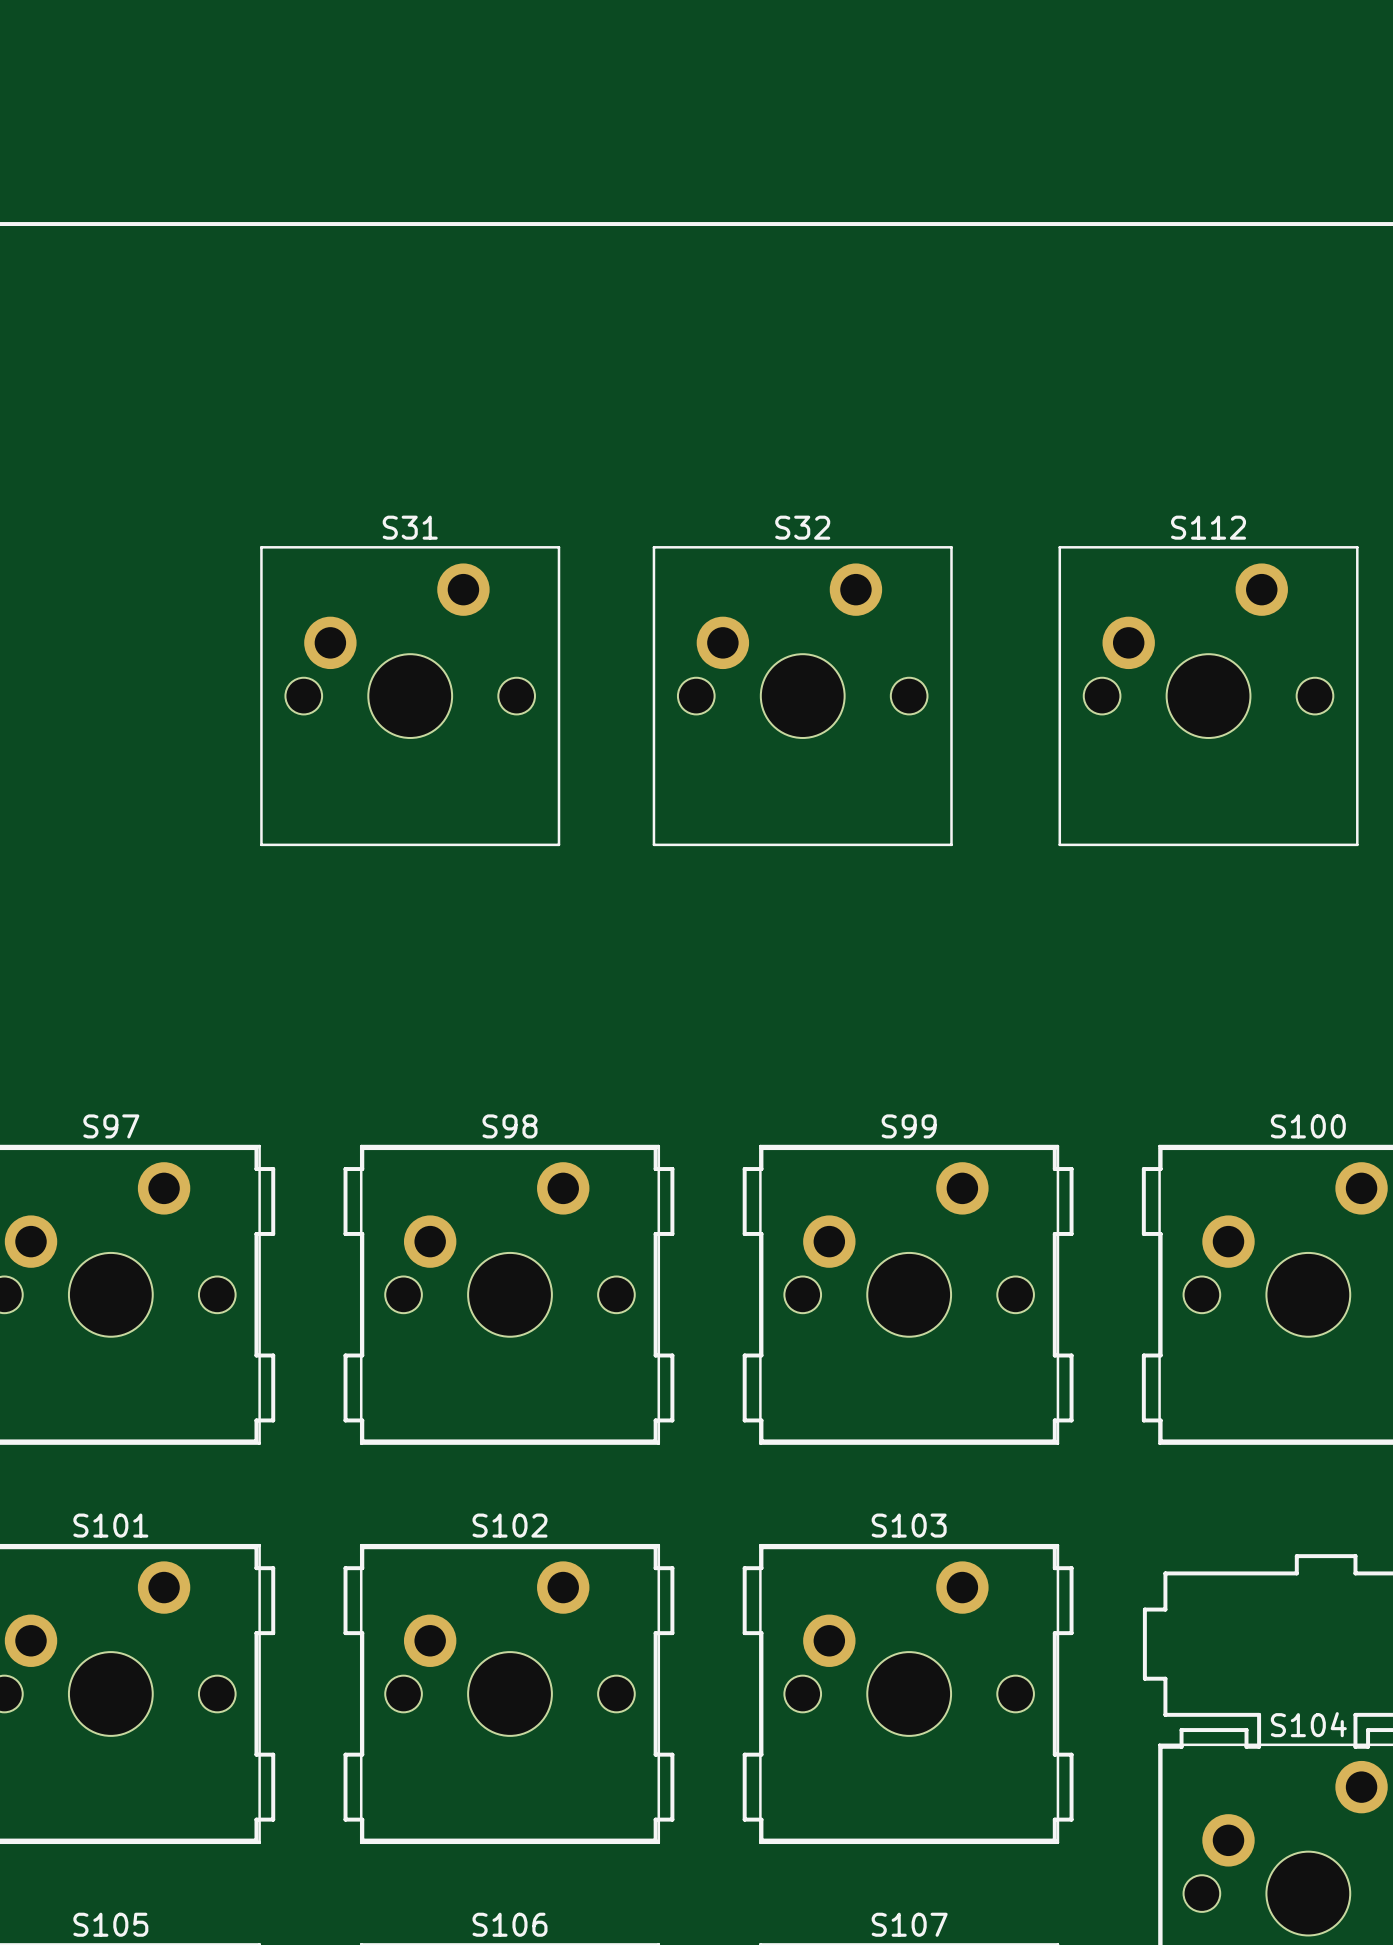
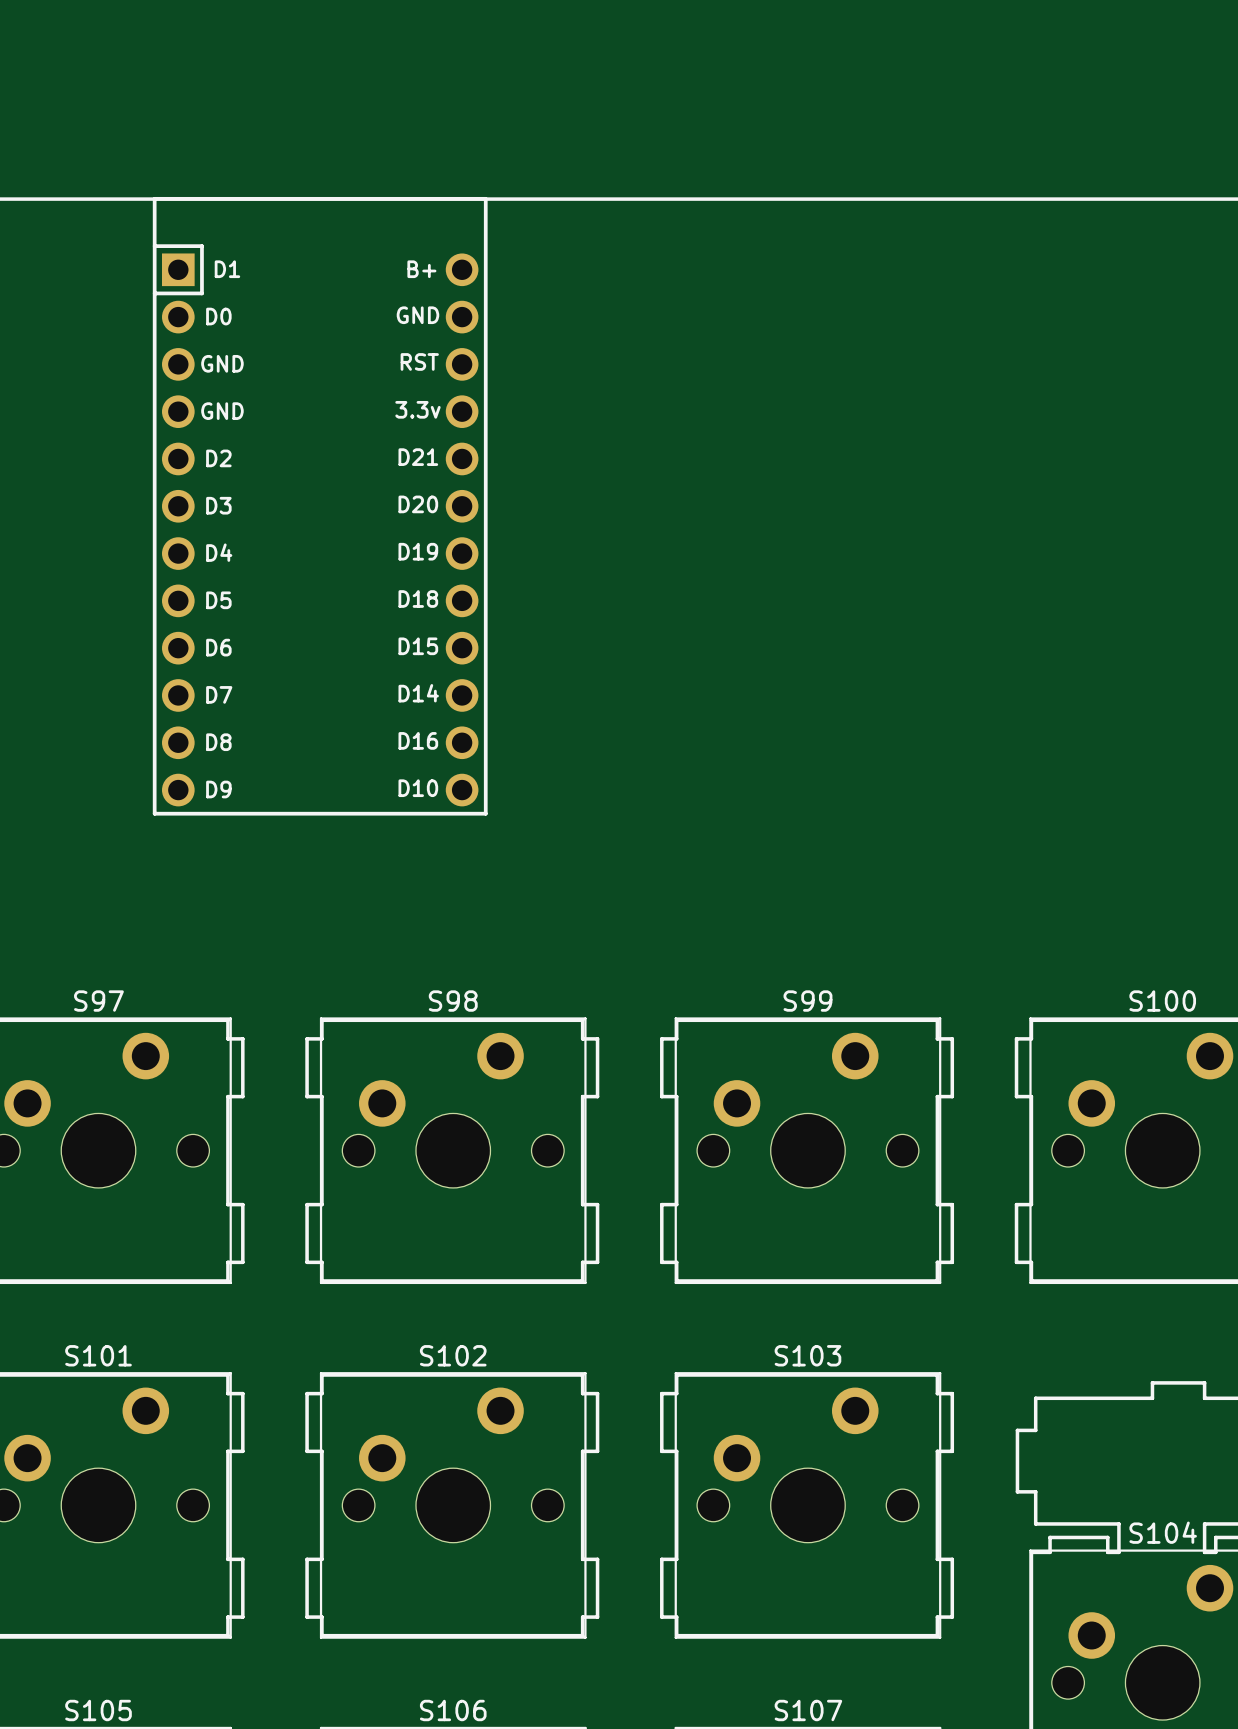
part: none -> (320, 506)
S31: (410, 696) -> none
S32: (802, 696) -> none
S112: (1208, 696) -> none

